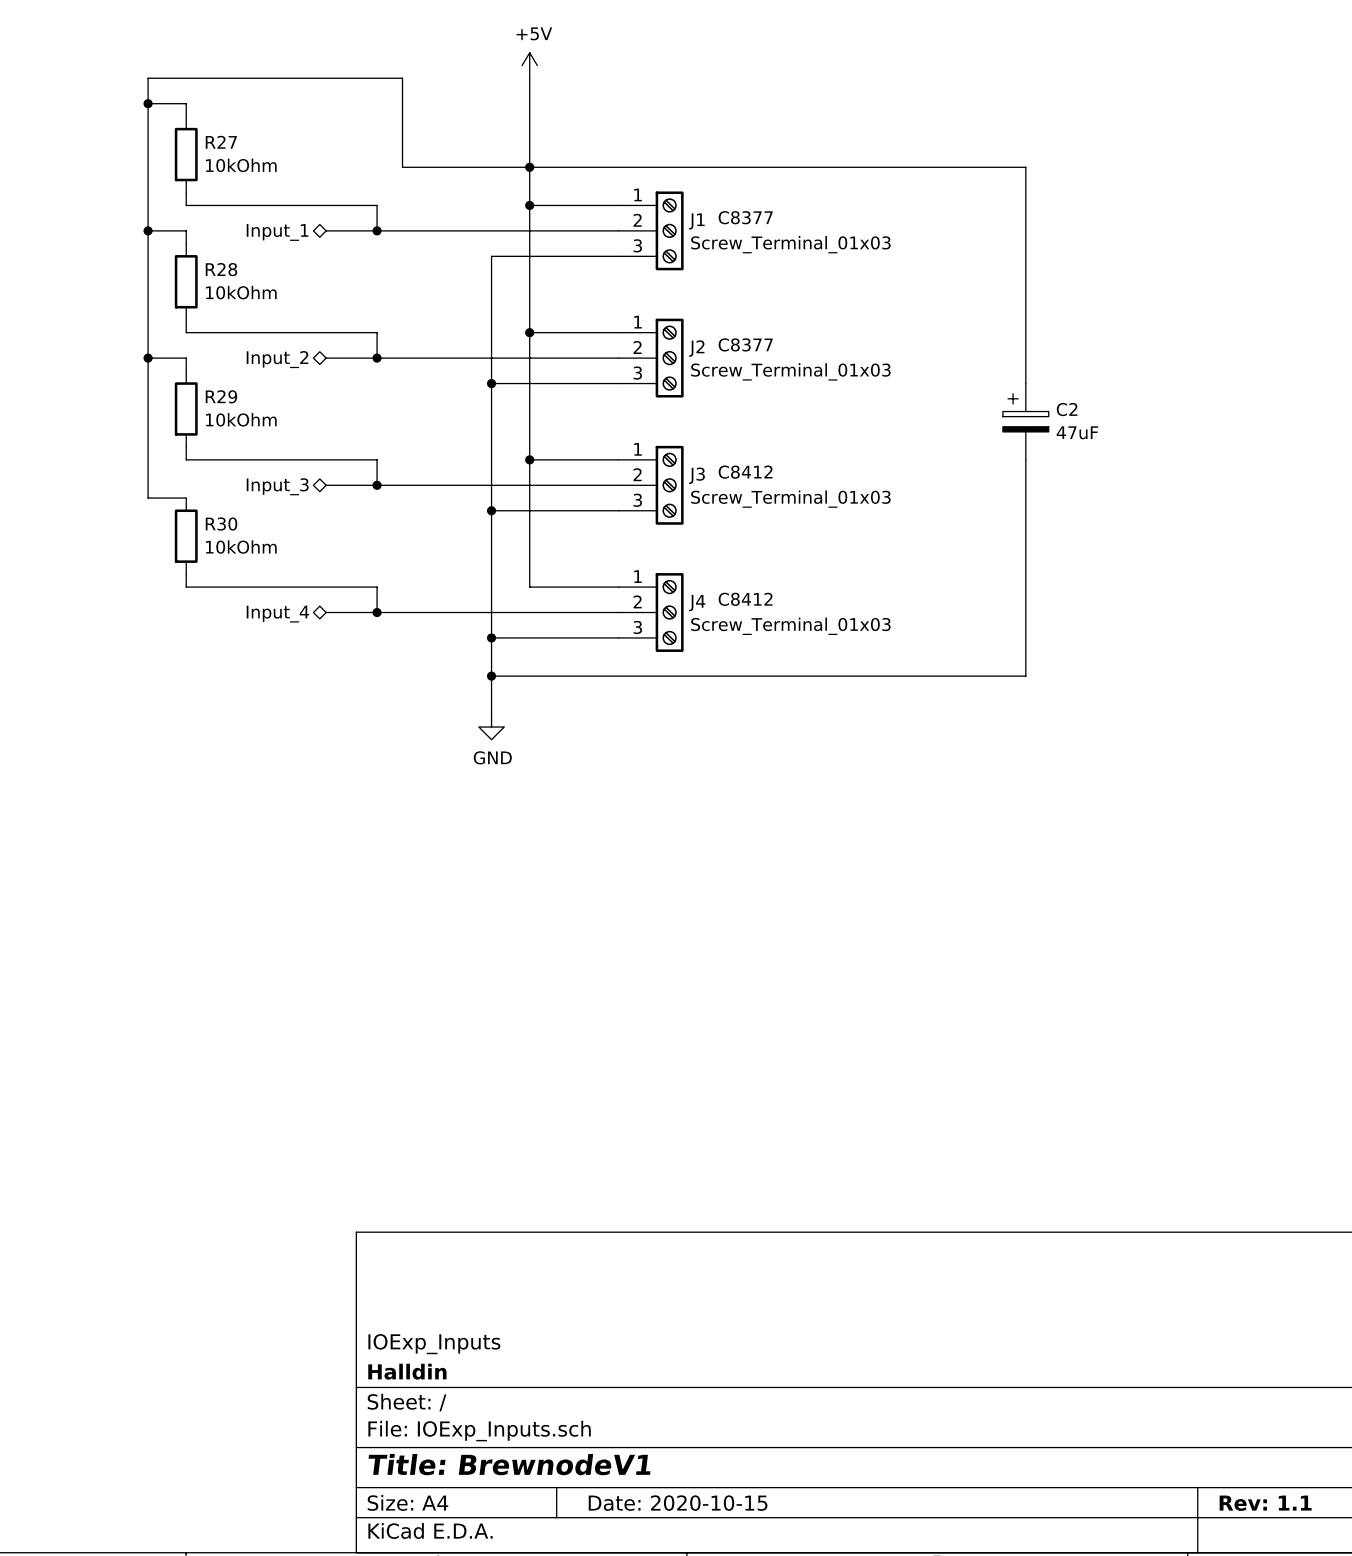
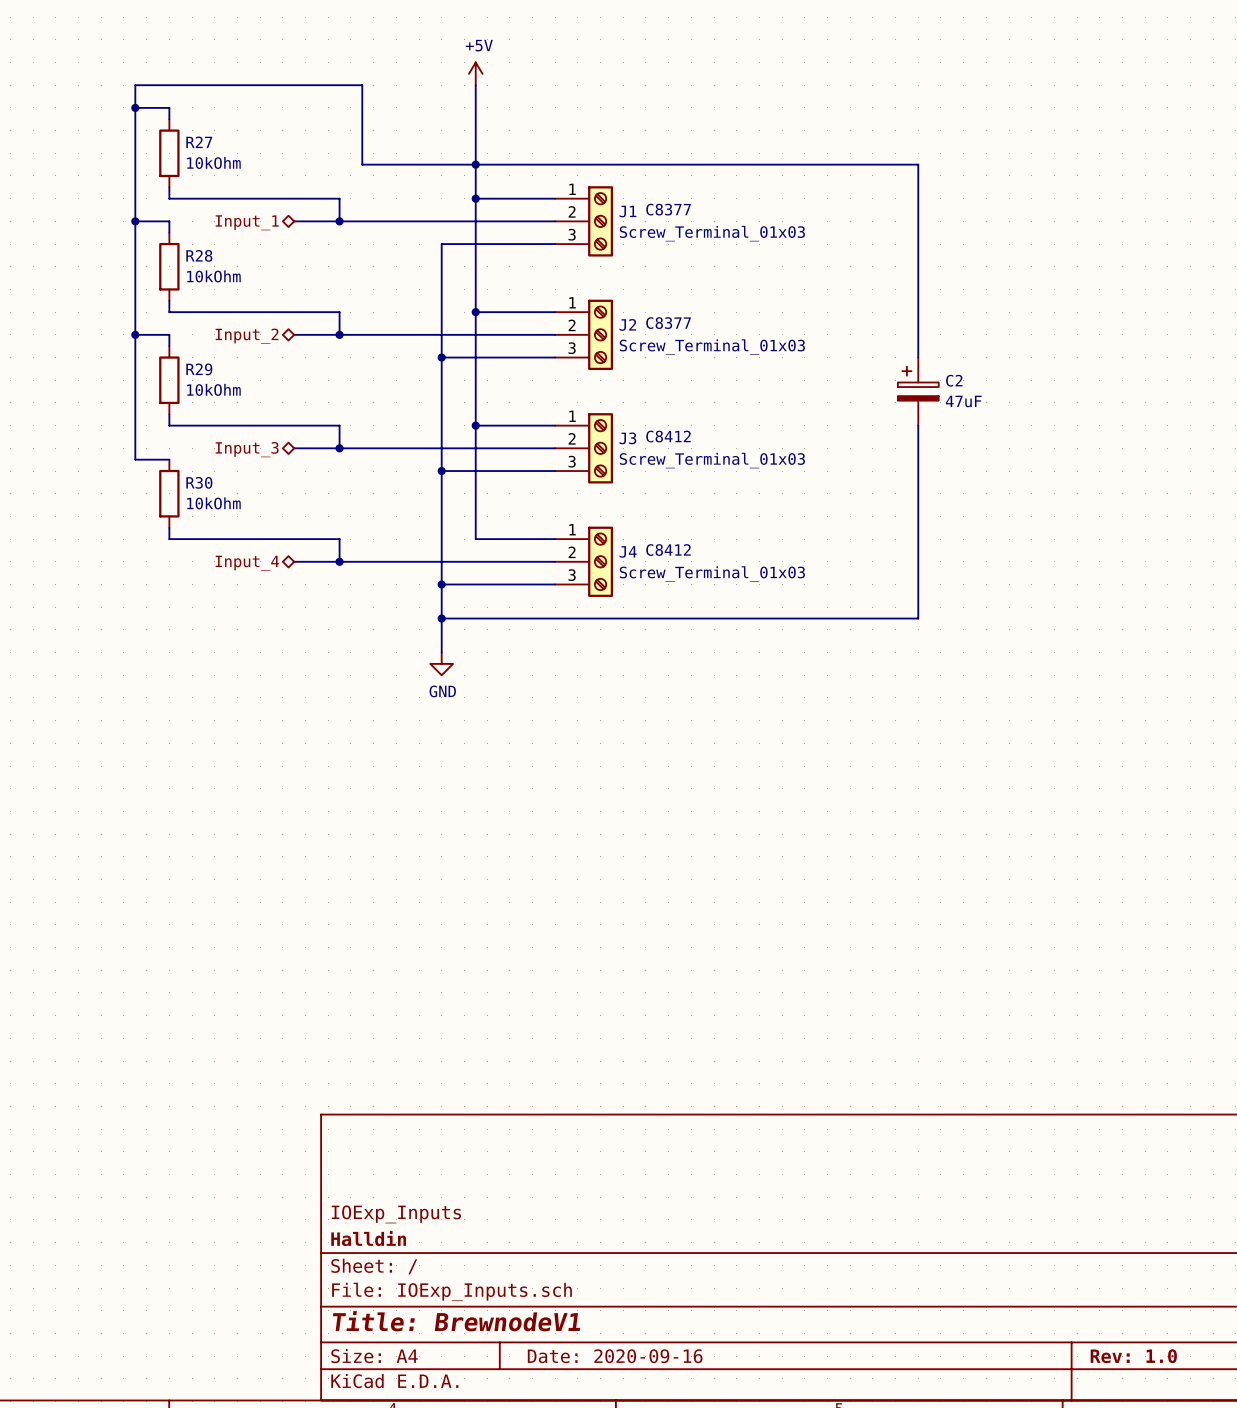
title block: Date: 2020-10-15 (678, 1503) -> Date: 2020-09-16 (615, 1356)
title block: Rev: 1.1 (1265, 1503) -> Rev: 1.0 (1133, 1356)

